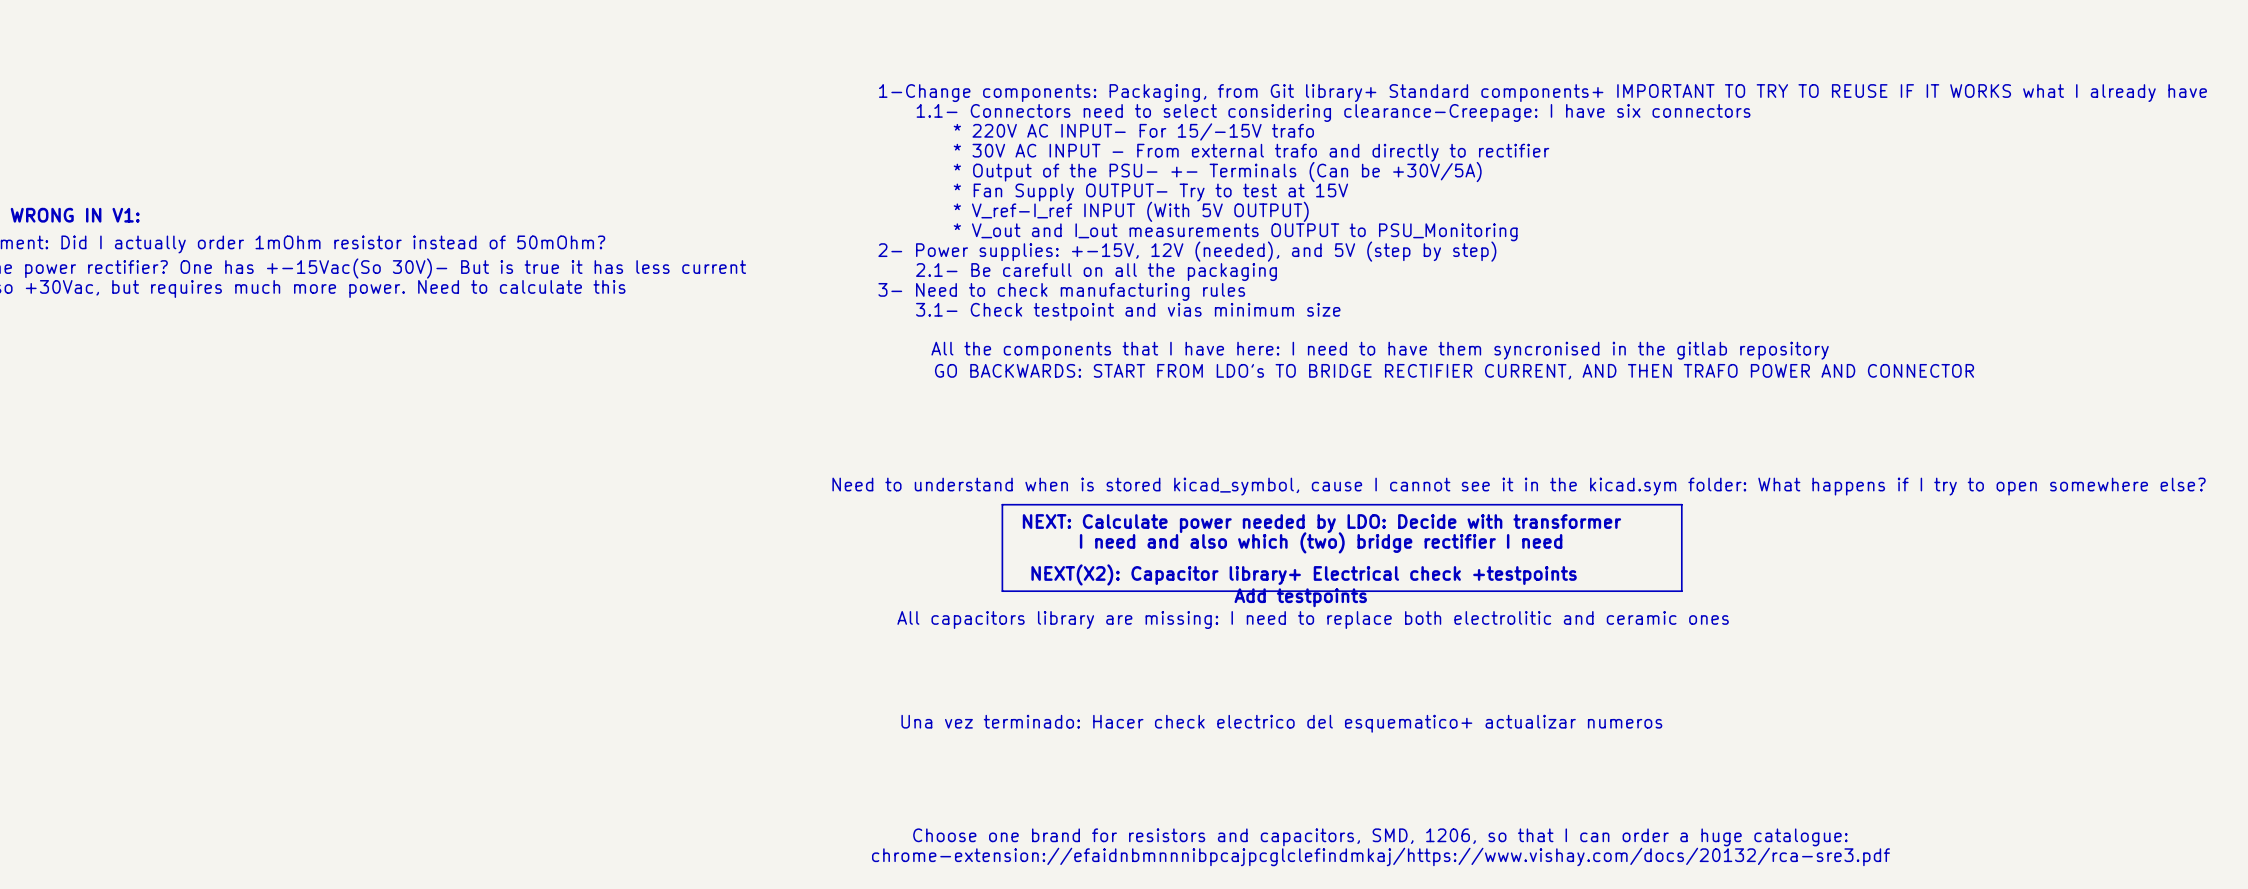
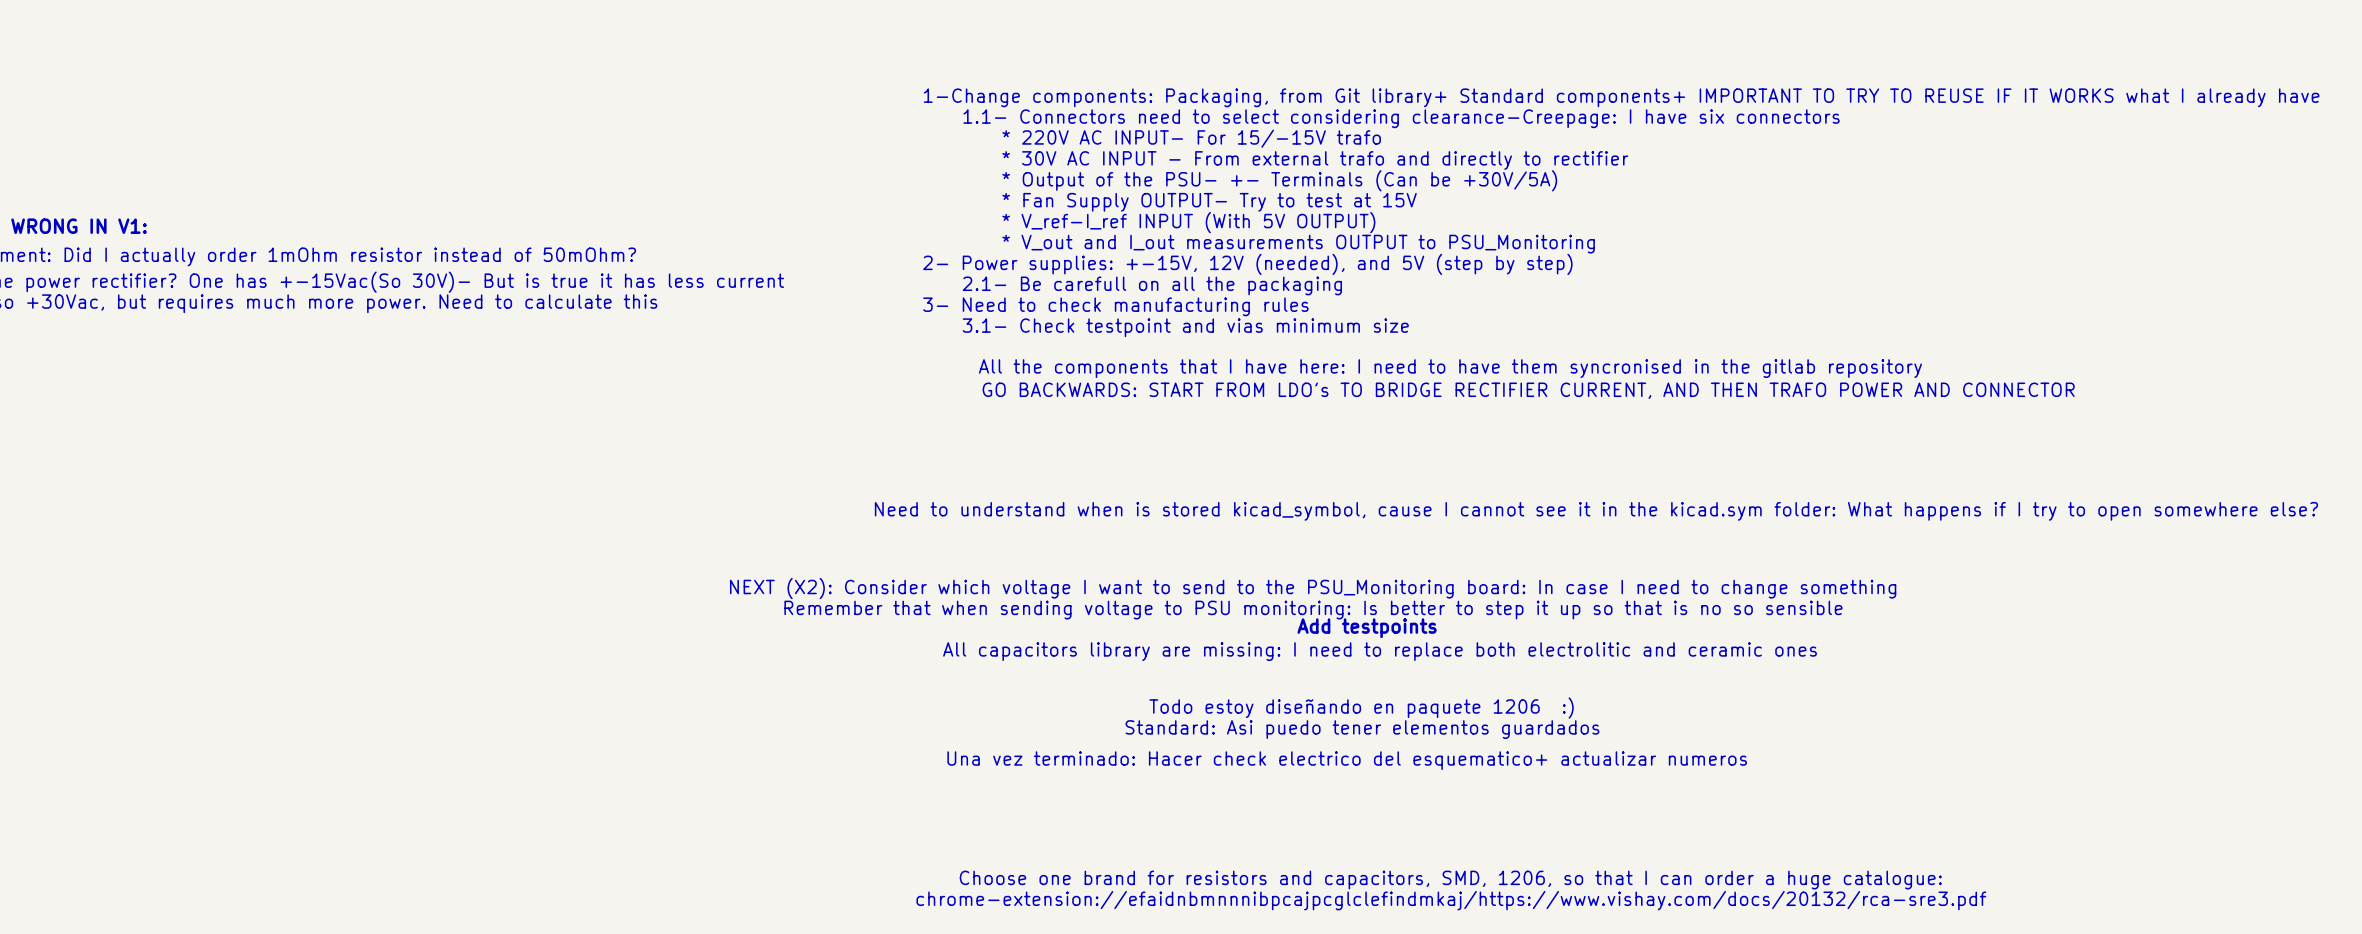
line: (1002, 504) (1681, 504) (1681, 591) (1002, 591) (1002, 504) -> none
text: NEXT: Calculate power needed by LDO: Decide with transformer (1321, 523) -> none
text: I need and also which (two) bridge rectifier I need (1321, 542) -> none
text: none -> NEXT (X2): Consider which voltage I want to send to the PSU_Monitoring board: In case I need to change something (1313, 588)
text: NEXT(X2): Capacitor library+ Electrical check +testpoints (1304, 574) -> none
text: none -> Remember that when sending voltage to PSU monitoring: Is better to step it up so that is no so sensible (1313, 610)
text: none -> Todo estoy diseñando en paquete 1206 :) (1361, 708)
text: none -> Standard: Asi puedo tener elementos guardados (1362, 729)

